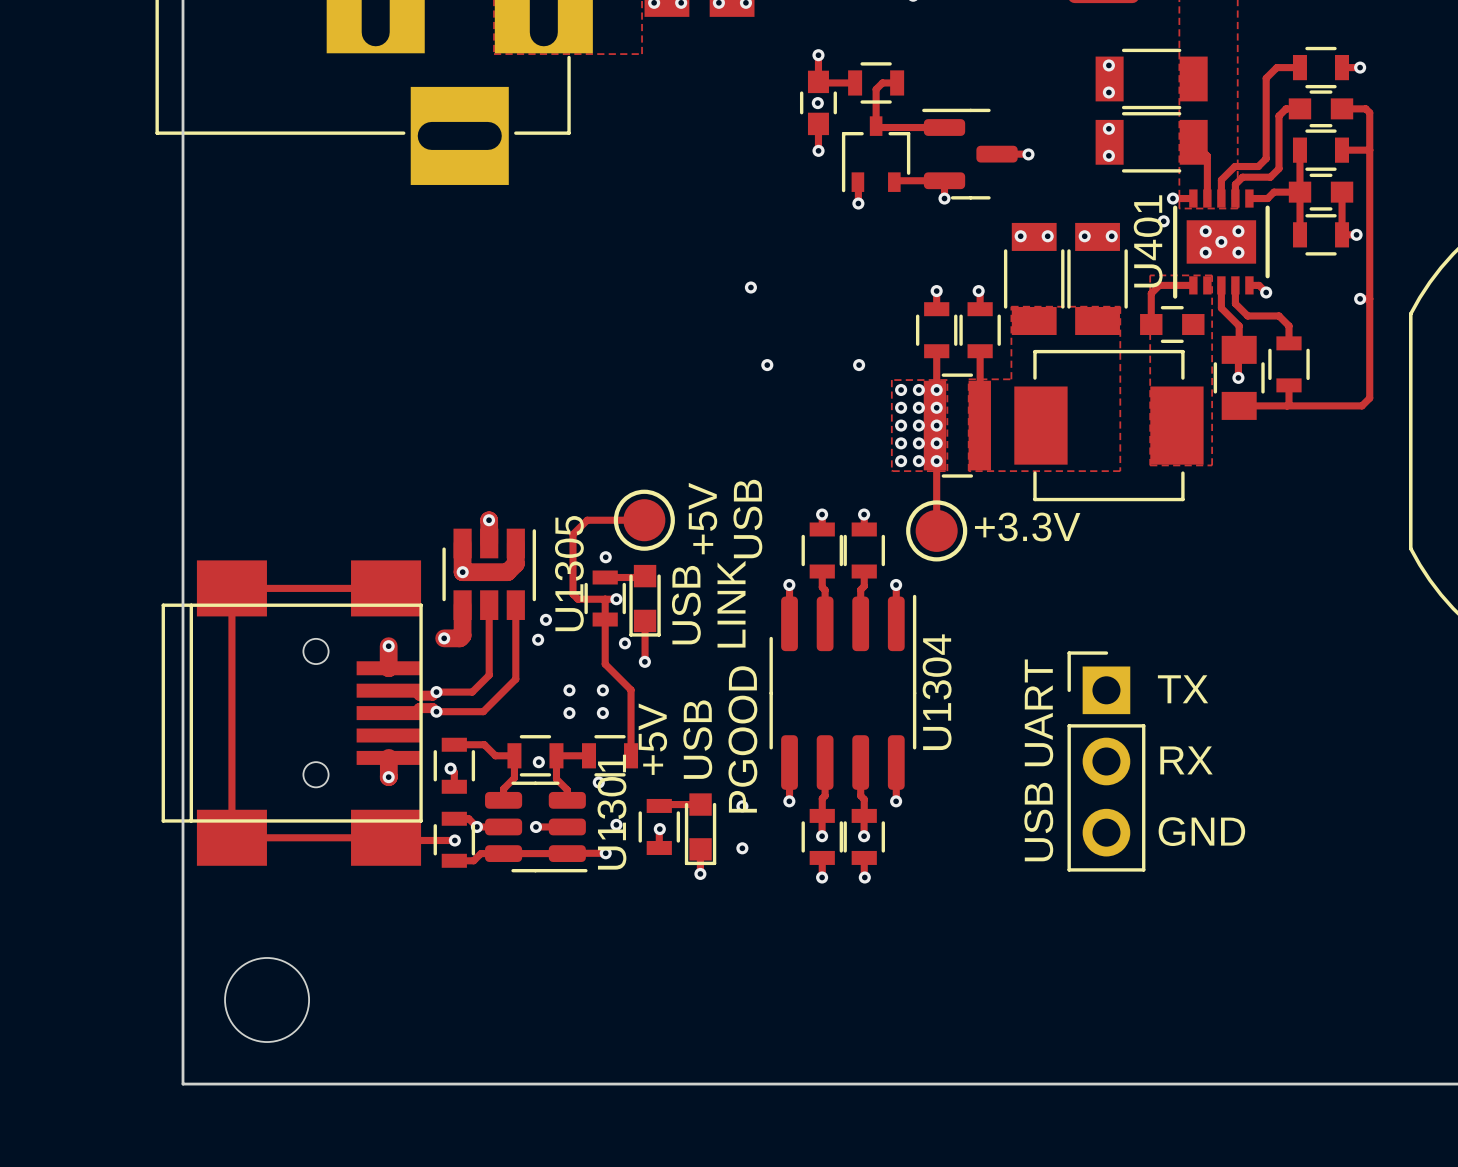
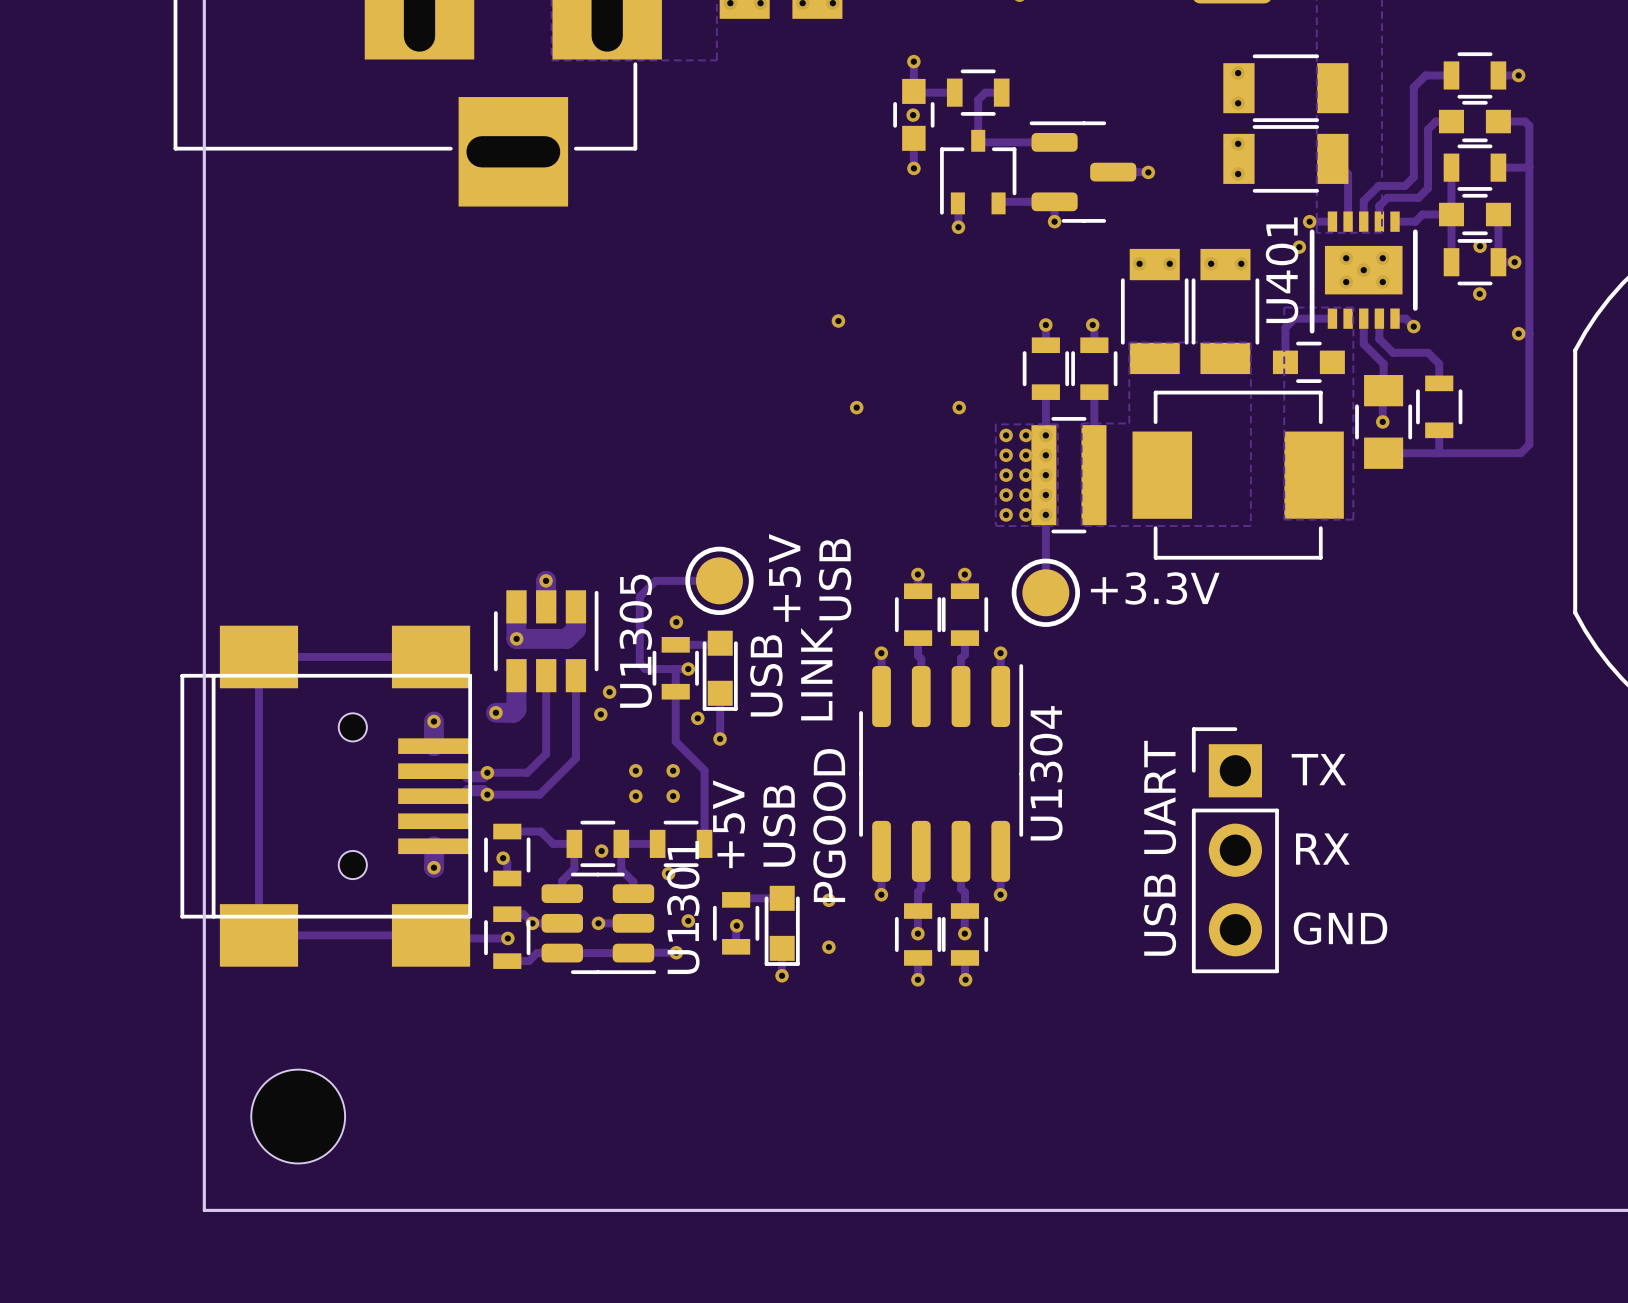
via: none -> (1480, 246)
via: none -> (1479, 293)

